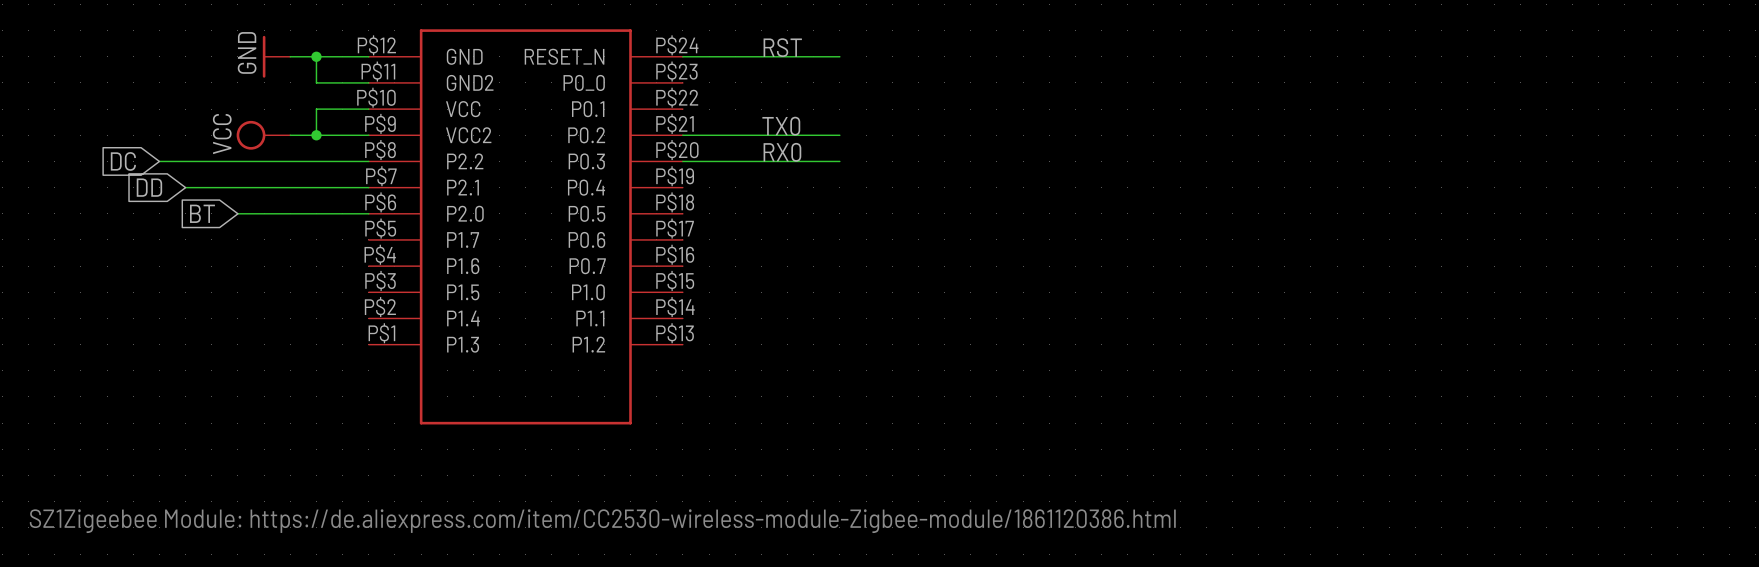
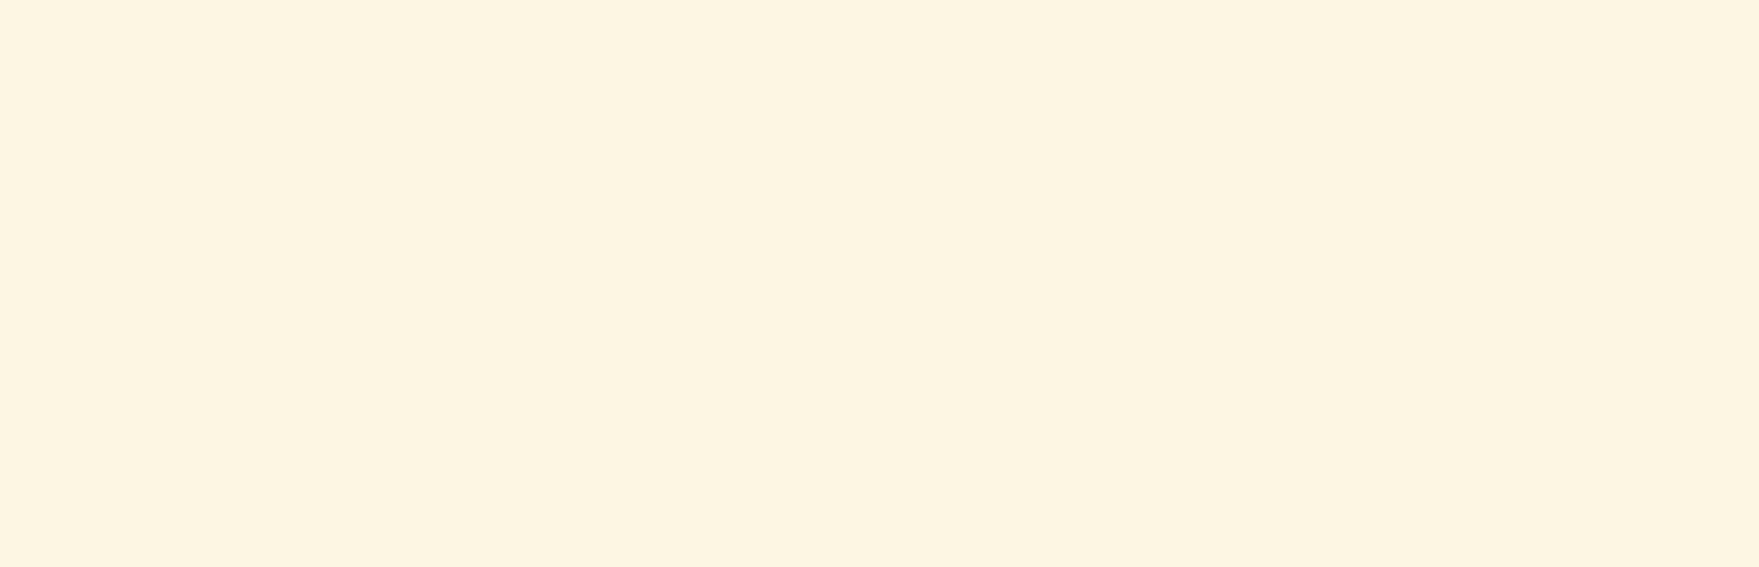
label: RST (782, 47) -> none
power symbol: GND (276, 56) -> none
wire: (290, 56) (368, 56) -> none
wire: (316, 56) (316, 82) (368, 82) -> none
junction: (316, 56) -> none
wire: (682, 56) (839, 56) -> none
wire: (368, 109) (316, 109) (316, 135) -> none
label: TX0 (781, 126) -> none
power symbol: VCC (263, 135) -> none
wire: (290, 135) (368, 135) -> none
junction: (316, 135) -> none
wire: (682, 135) (839, 135) -> none
label: RX0 (782, 152) -> none
global label: DC (123, 161) -> none
wire: (159, 161) (368, 161) -> none
wire: (682, 161) (839, 161) -> none
global label: DD (149, 187) -> none
wire: (185, 187) (368, 187) -> none
global label: BT (202, 213) -> none
wire: (237, 213) (368, 213) -> none
part: (525, 226) -> none
text: SZ1Zigeebee Module: https://de.aliexpress.com/item/CC2530-wireless-module-Zigbee-module/1861120386.html (602, 521) -> none

